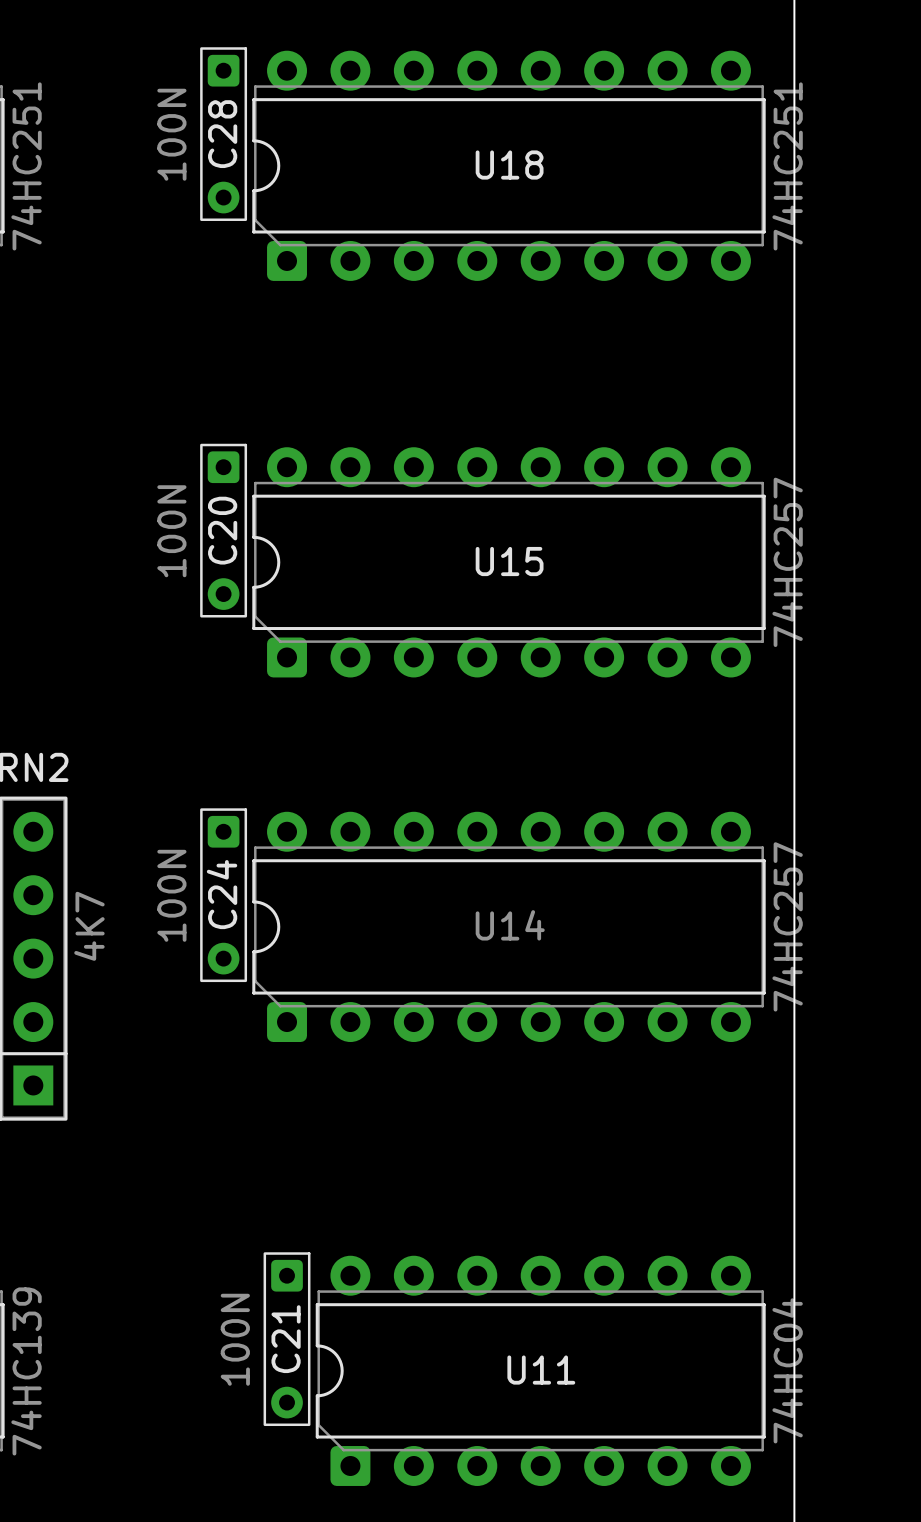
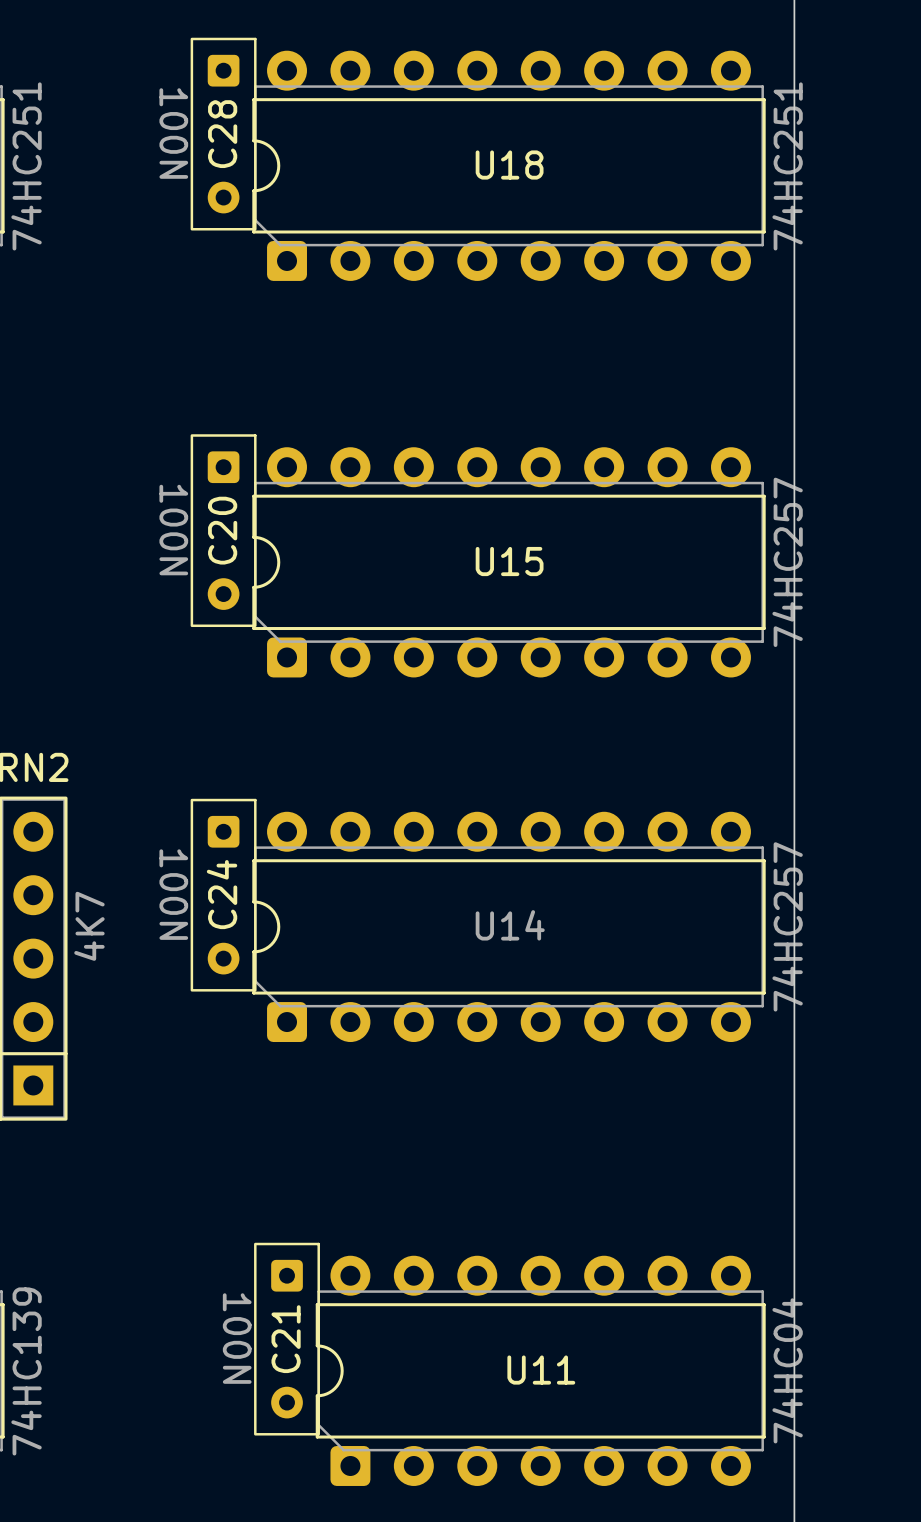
C28 footprint: [200, 47, 248, 221] -> [190, 37, 257, 231]
C28 value rotation: 0° (171, 134) -> 180° (173, 133)
C20 footprint: [200, 443, 248, 618] -> [190, 434, 257, 628]
C20 value rotation: 0° (171, 531) -> 180° (173, 530)
C24 footprint: [200, 808, 248, 983] -> [190, 798, 257, 992]
C24 value rotation: 0° (171, 895) -> 180° (173, 894)
C21 footprint: [263, 1252, 311, 1427] -> [254, 1242, 320, 1436]
C21 value rotation: 0° (235, 1339) -> 180° (237, 1338)

